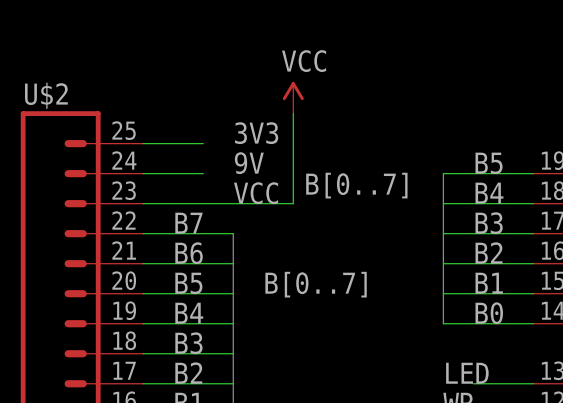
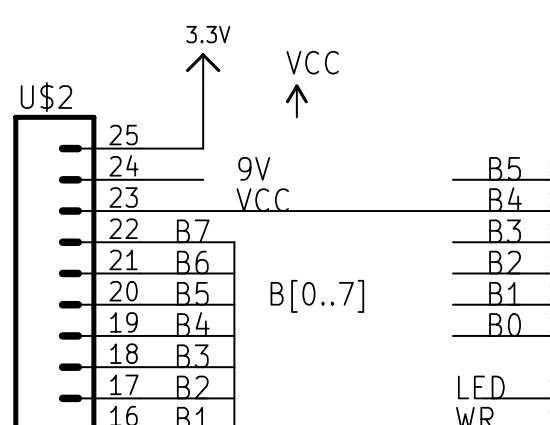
power symbol: none -> 3.3V (203, 69)
wire: none -> (203, 86) (203, 148)
wire: (293, 113) (293, 203) -> (453, 211) (296, 211)
label: 3V3 (256, 133) -> none
bus: (443, 173) (443, 323) -> none
label: B[0..7] (356, 185) -> none

